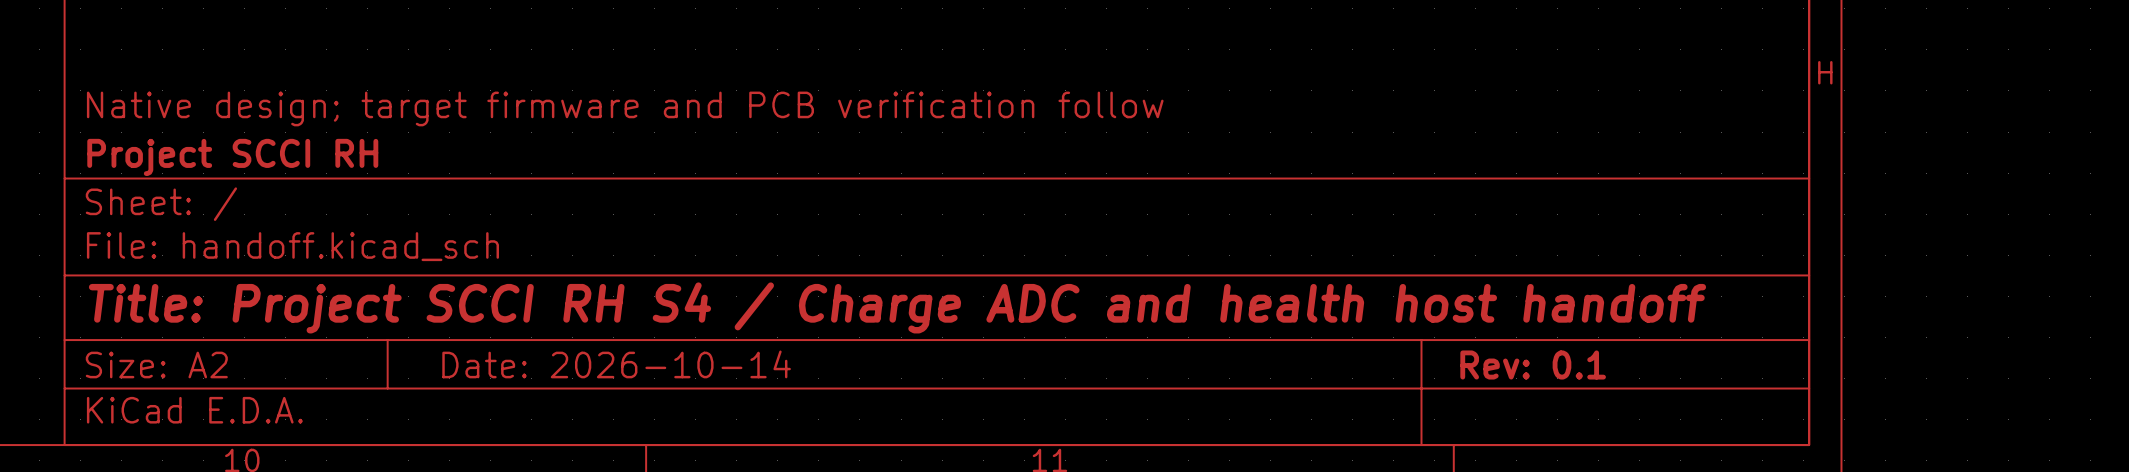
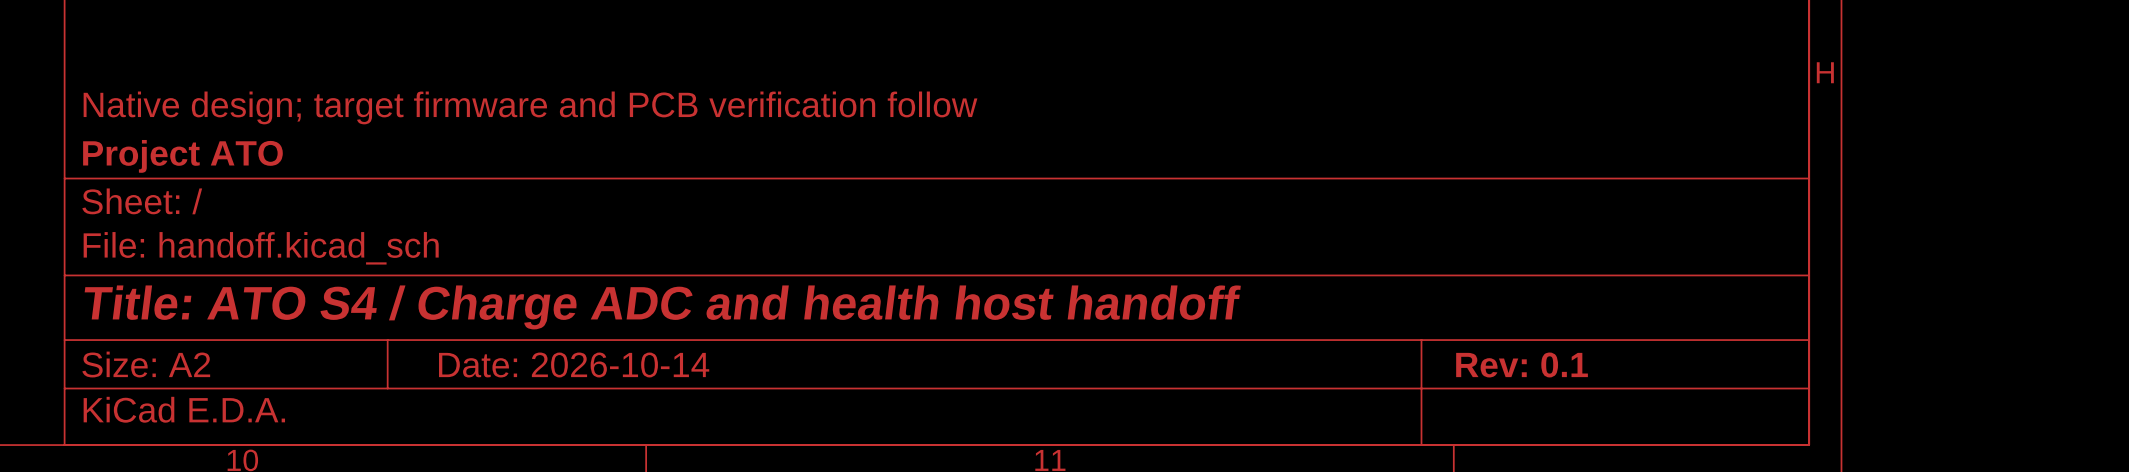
title block: Project SCCI RH (232, 157) -> Project ATO (182, 156)
title block: Title: Project SCCI RH S4 / Charge ADC and health host handoff (897, 307) -> Title: ATO S4 / Charge ADC and health host handoff (662, 307)

